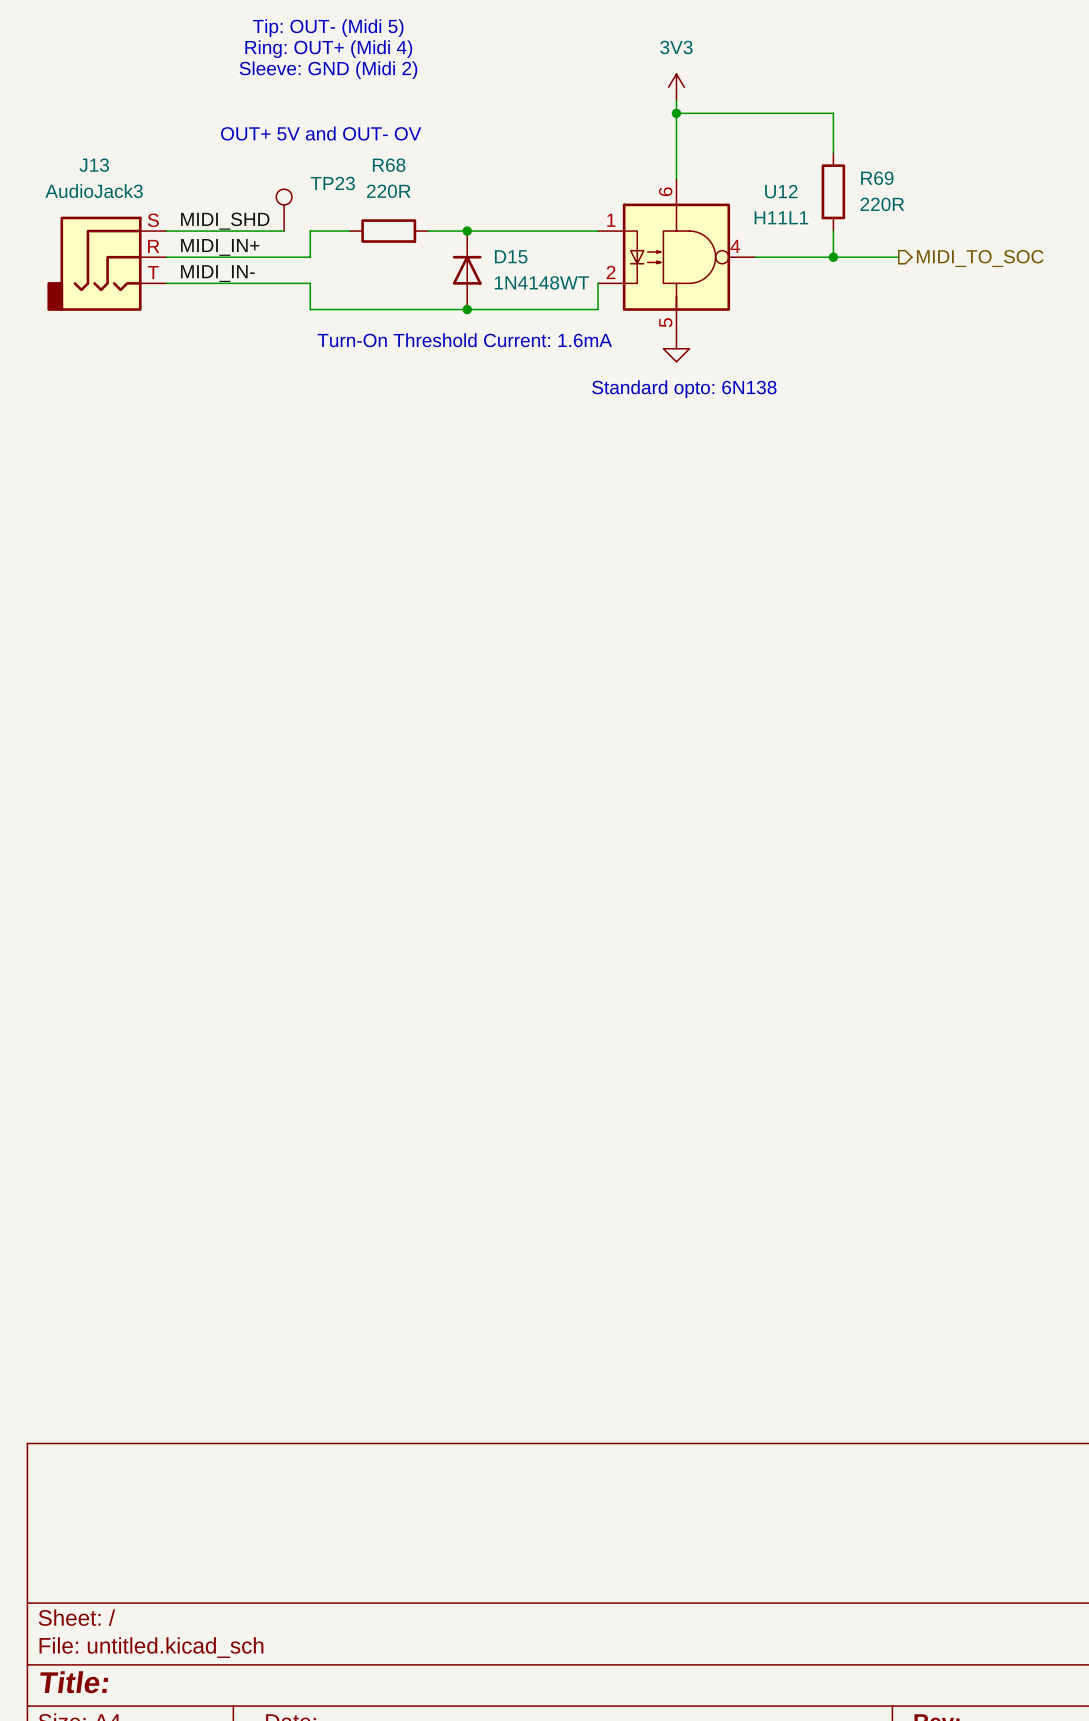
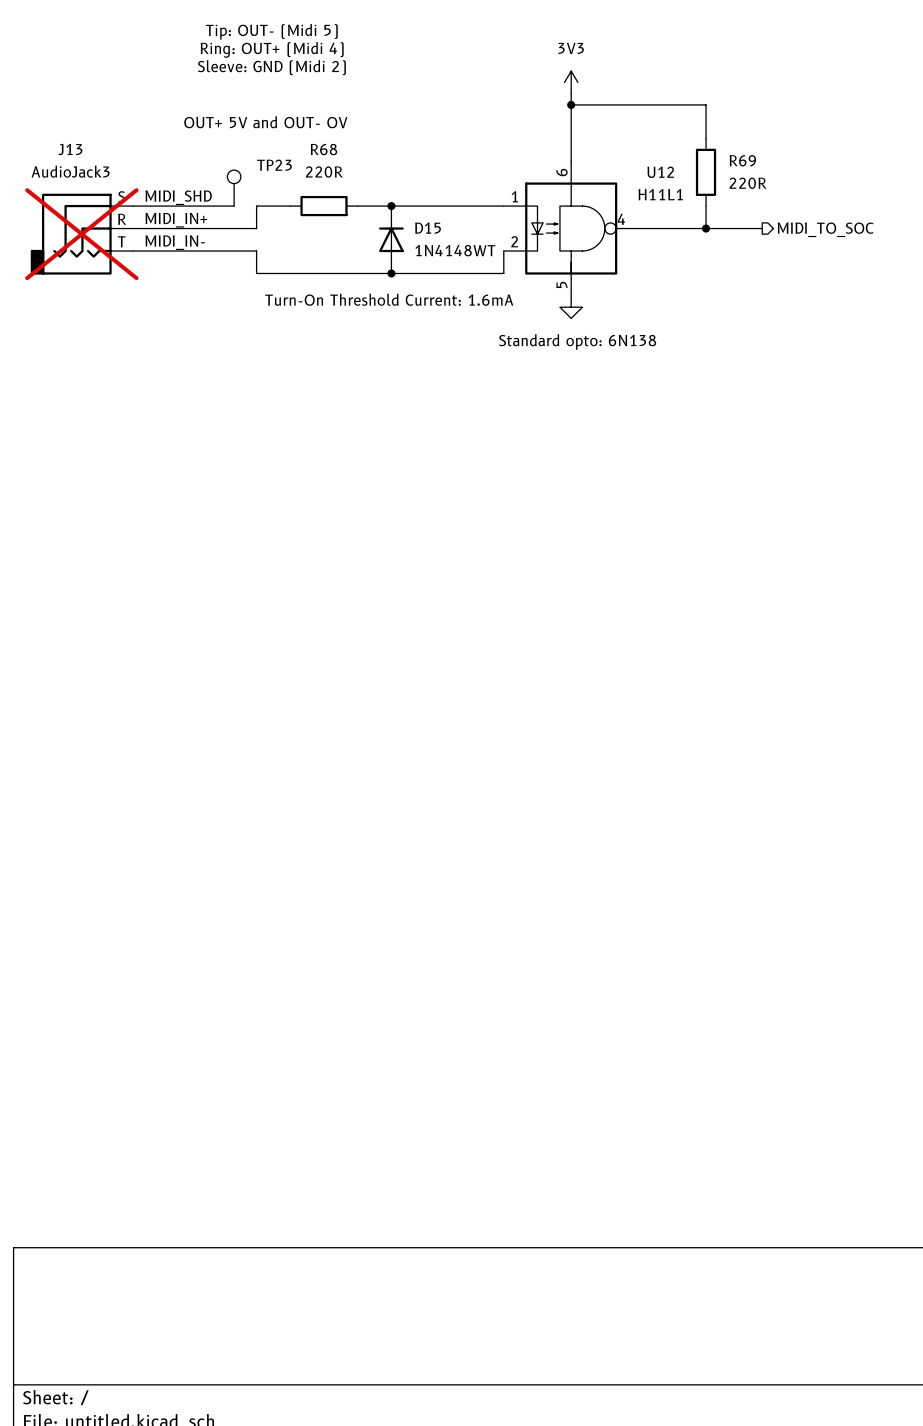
J13 do-not-place cross: none -> (81, 234)

